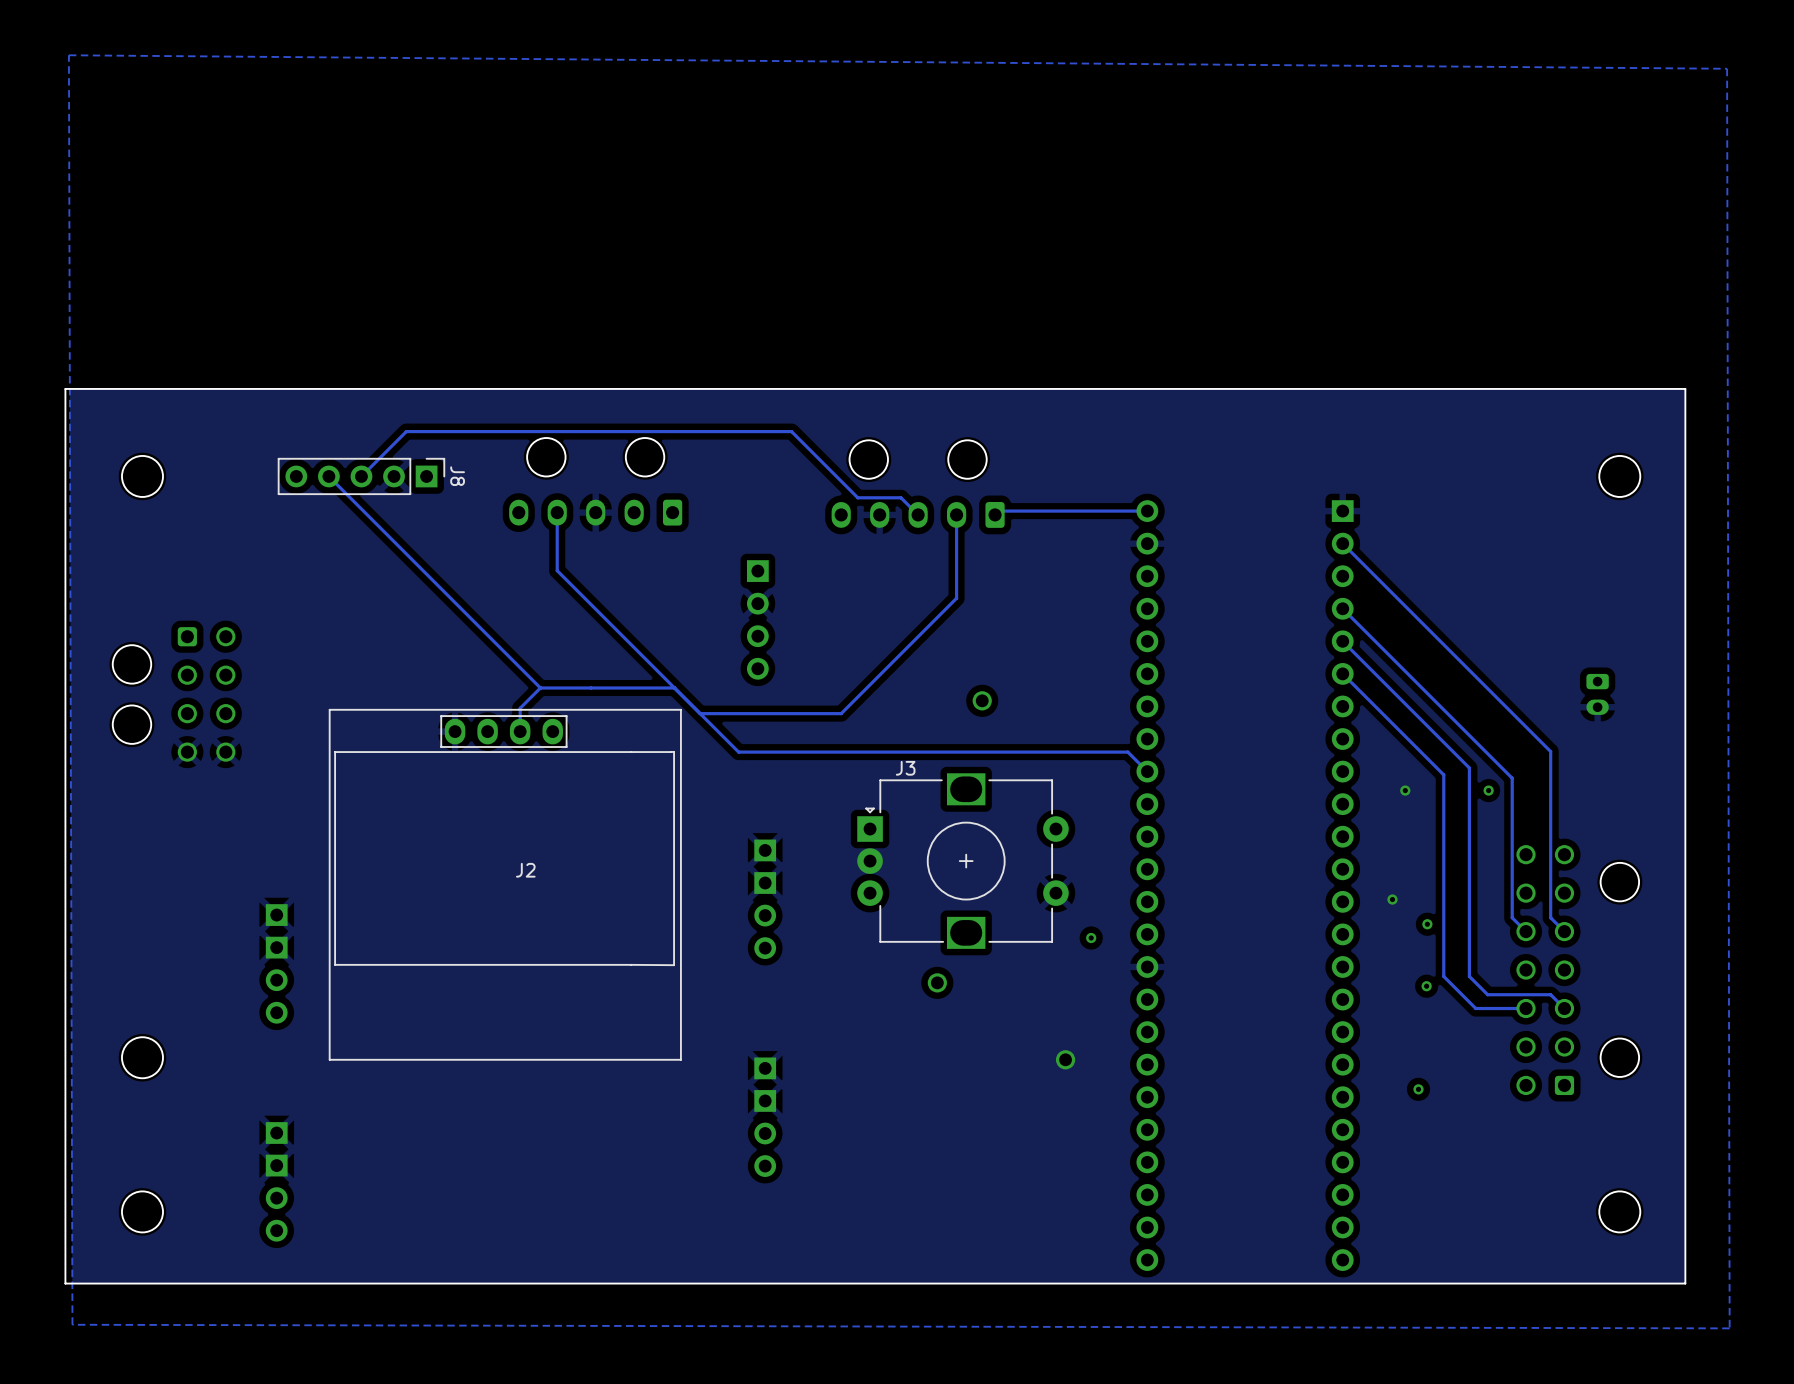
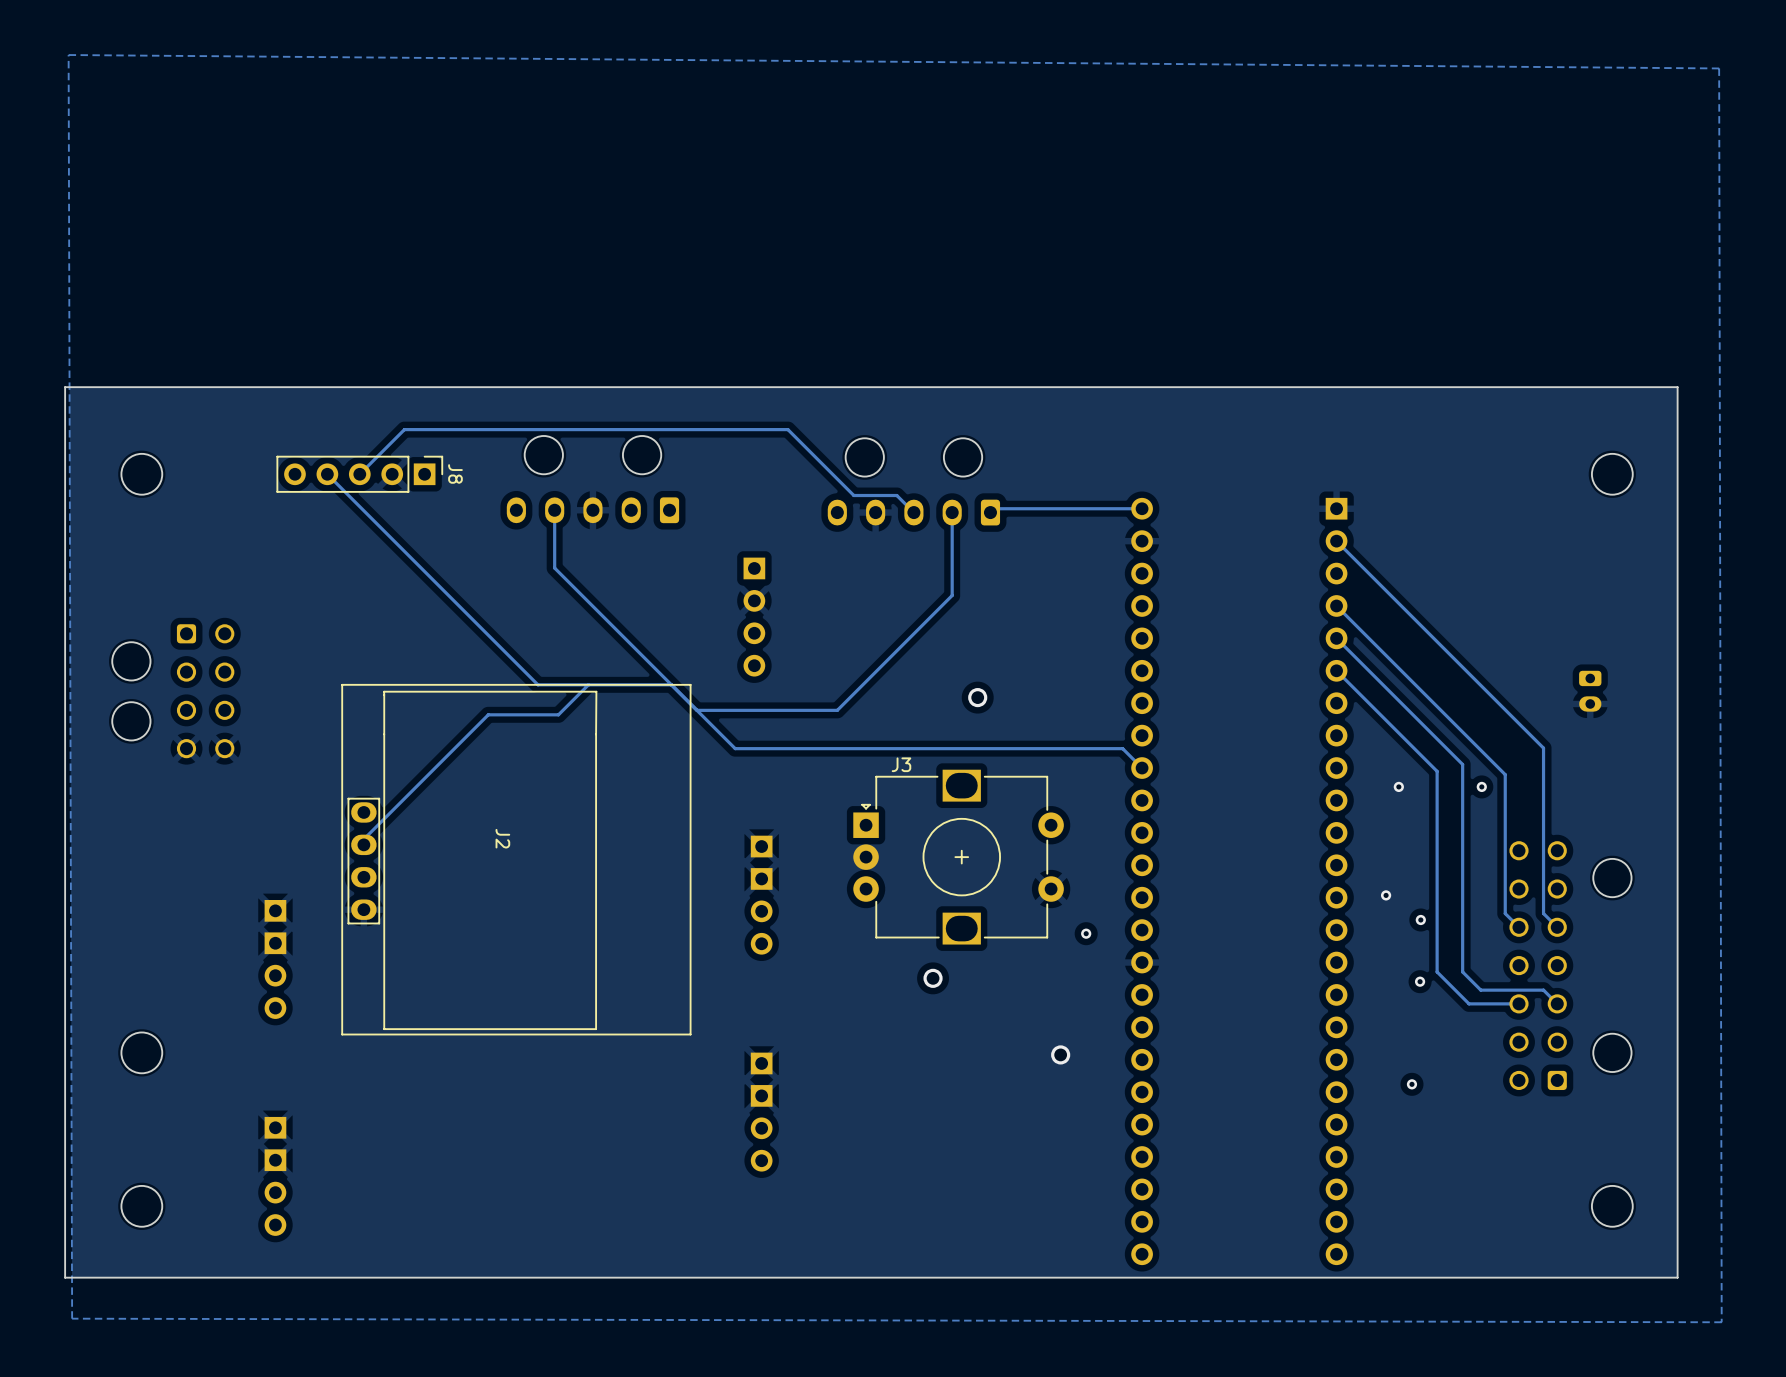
track: (540, 688) (520, 708) (520, 731) -> none
track: none -> (588, 684) (558, 714) (488, 714) (363, 839) (363, 844)
J2 rotation: 0° (505, 884) -> 90° counterclockwise (516, 859)

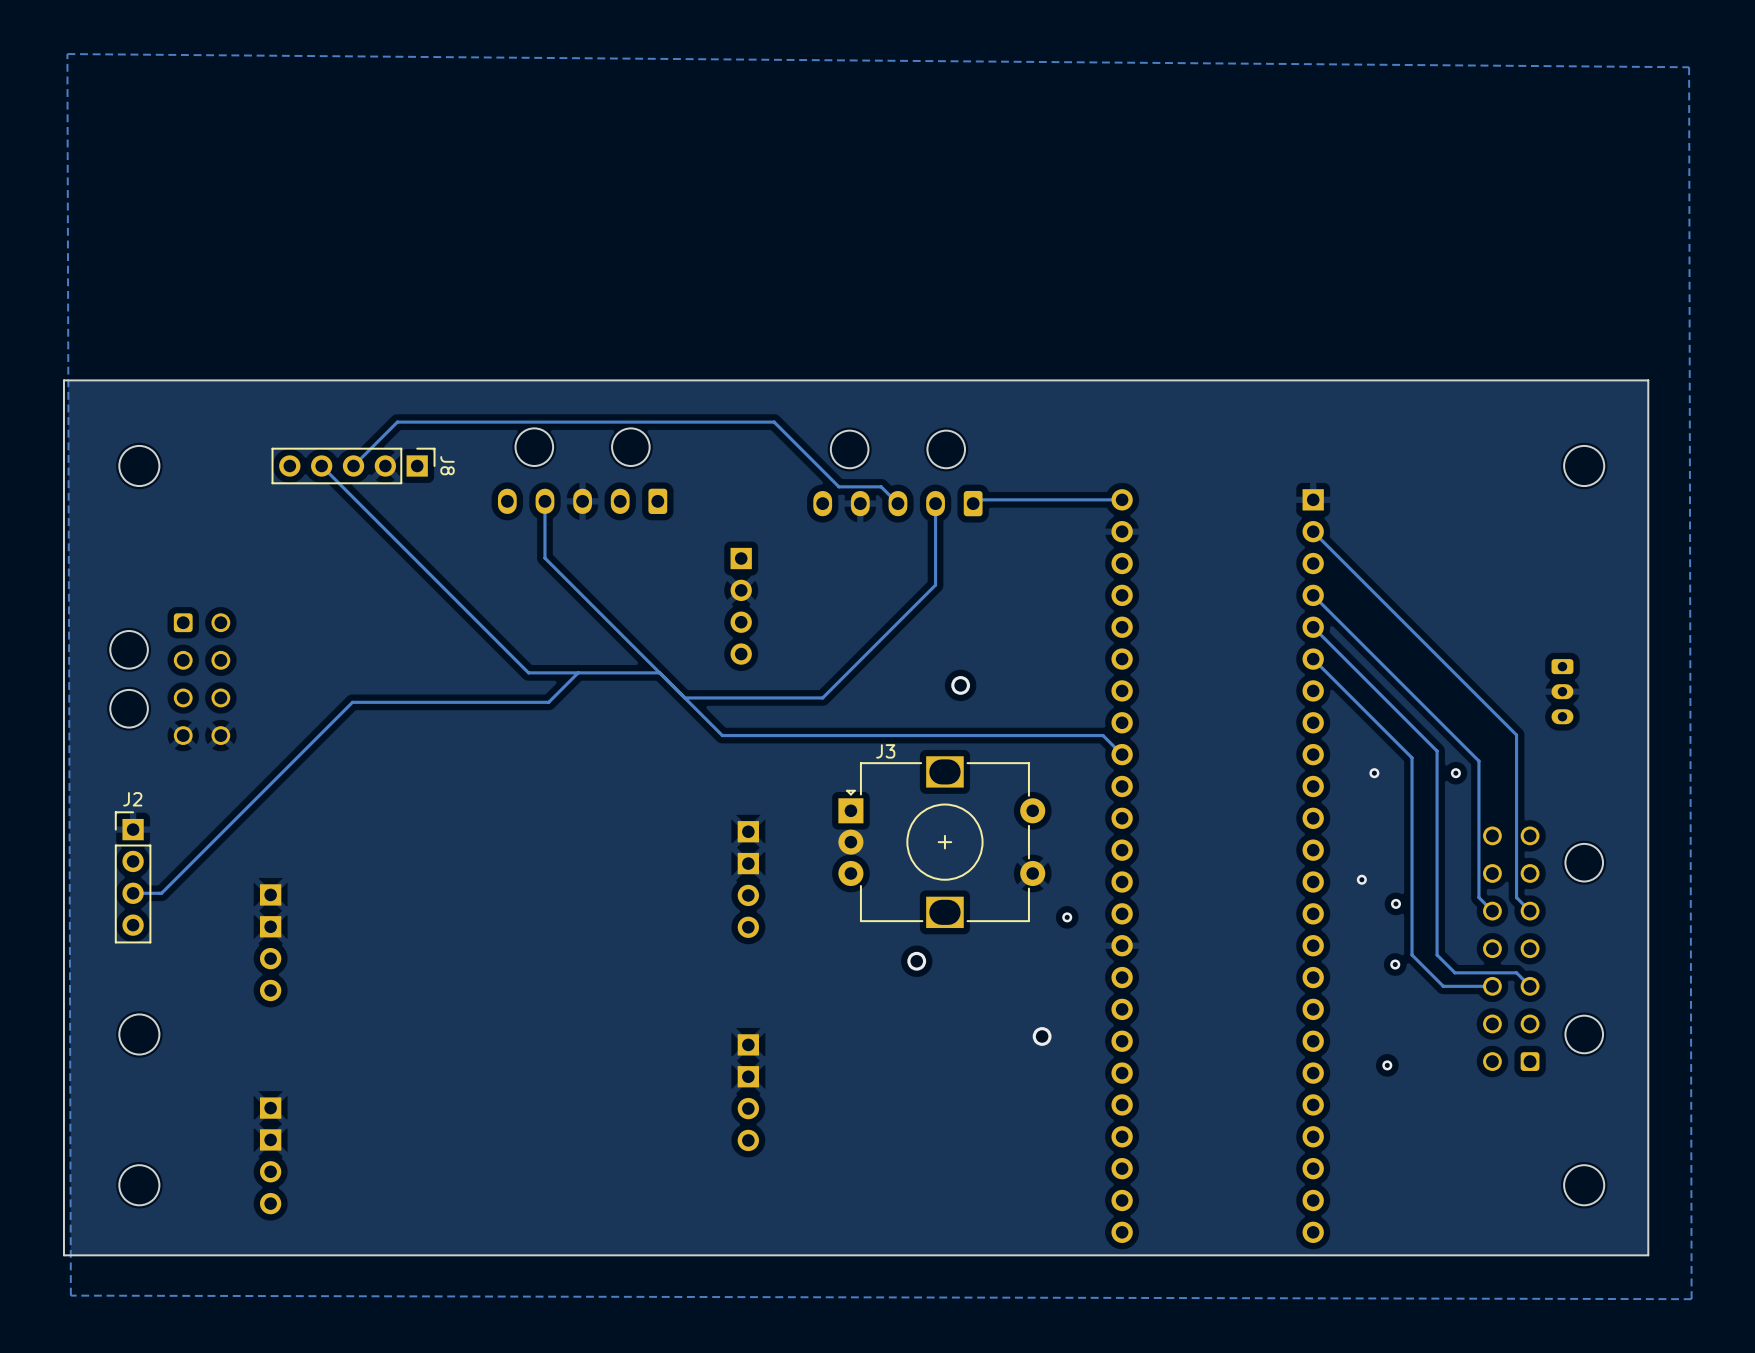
part footprint: [1579, 670, 1602, 712] -> [1551, 659, 1574, 725]
J2 footprint: [341, 684, 692, 1036] -> [115, 811, 152, 944]
track: (488, 714) (363, 839) (363, 844) -> (479, 702) (352, 702) (161, 893) (133, 893)
J2 name position: J2 (502, 838) -> J2 (132, 799)

